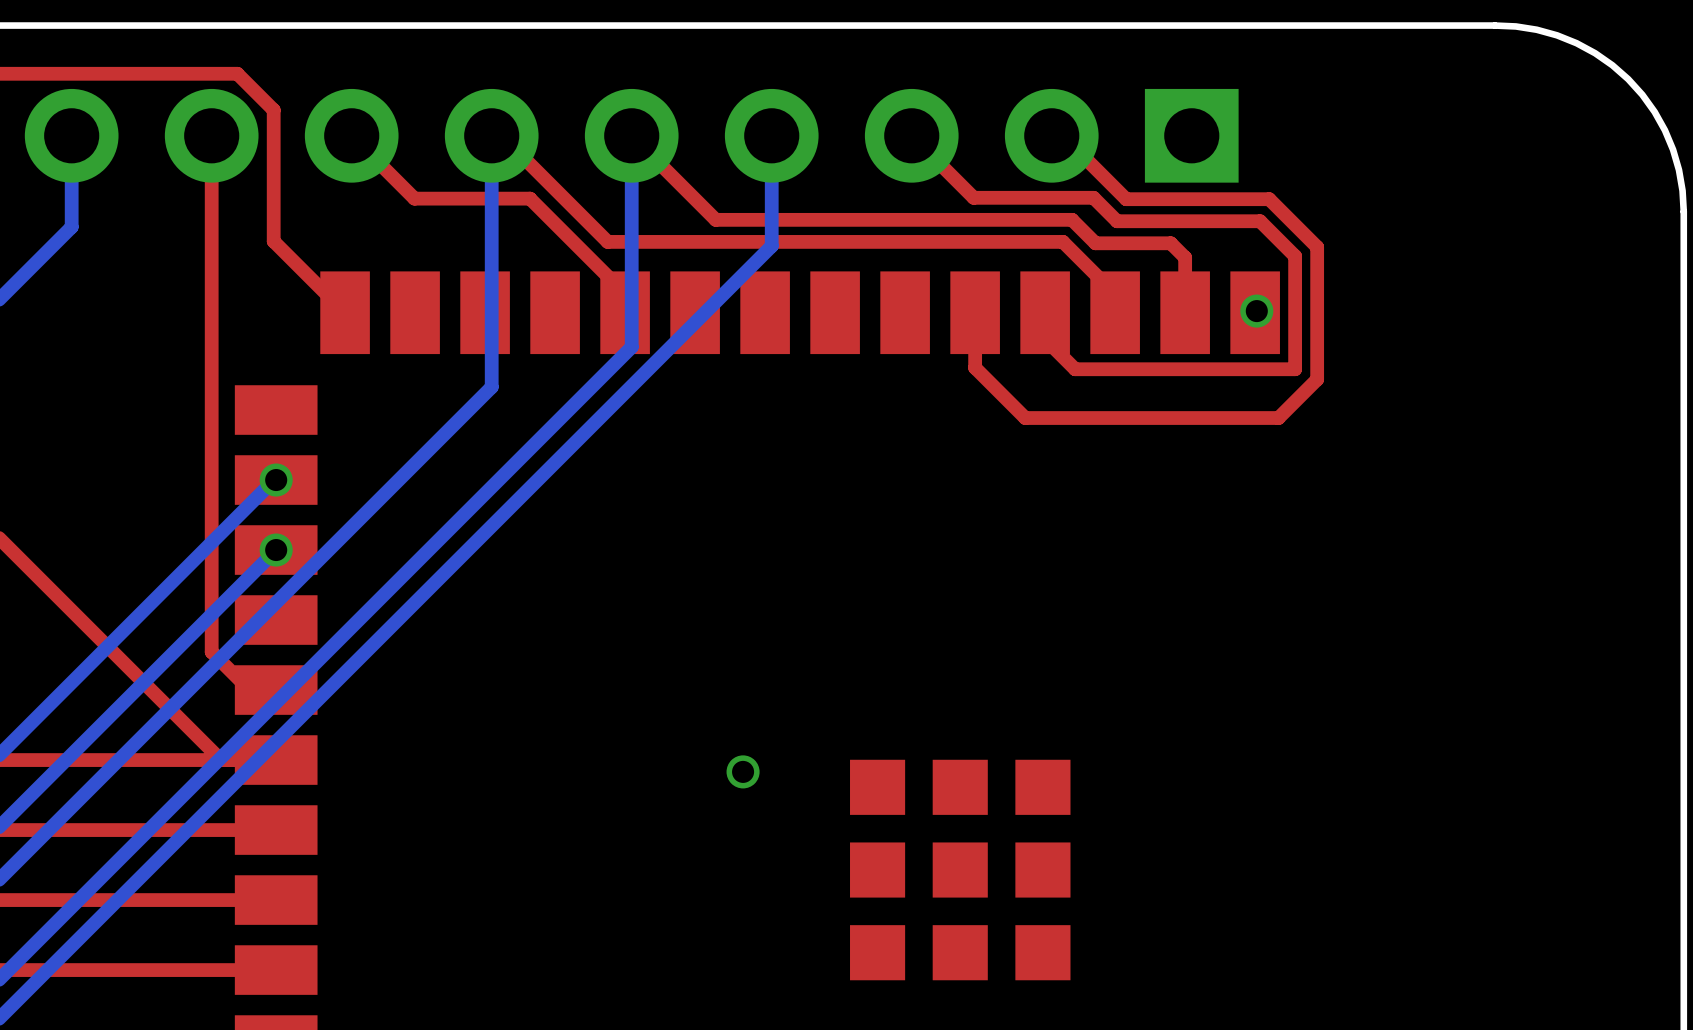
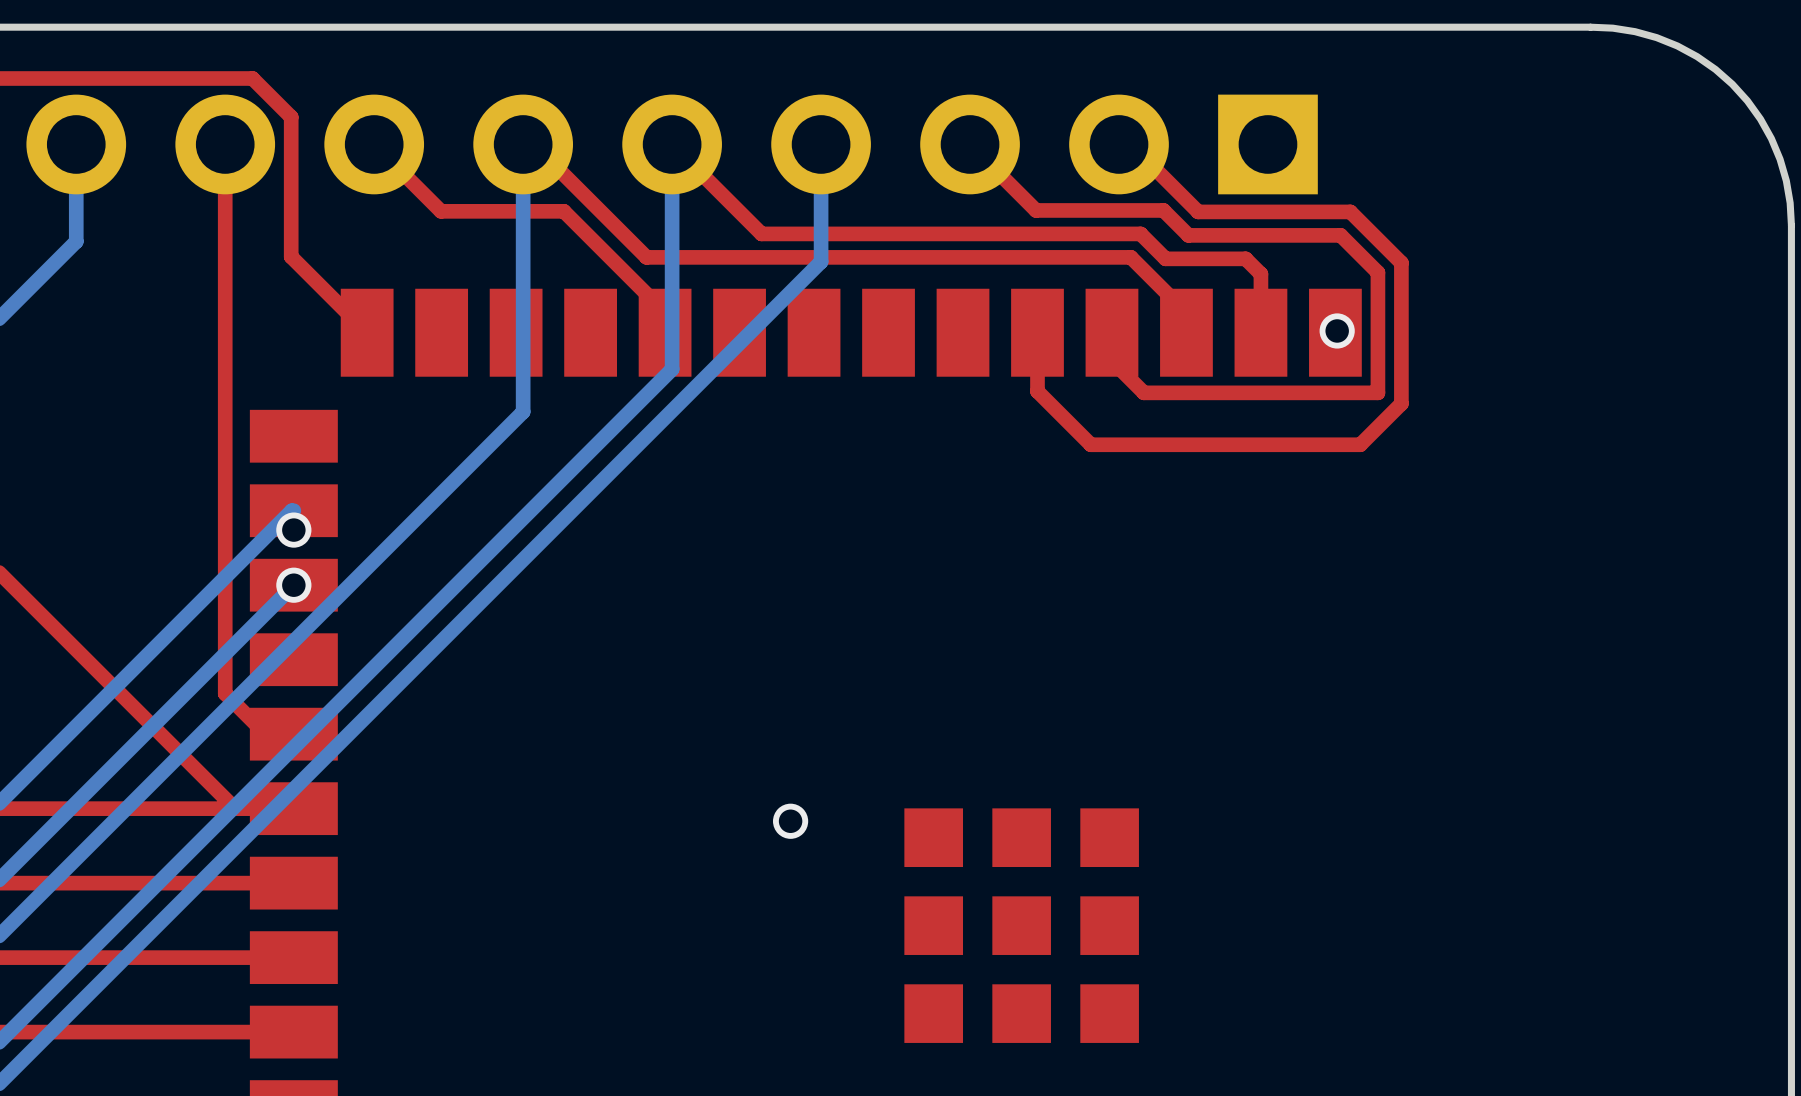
via position: (276, 480) -> (293, 530)

